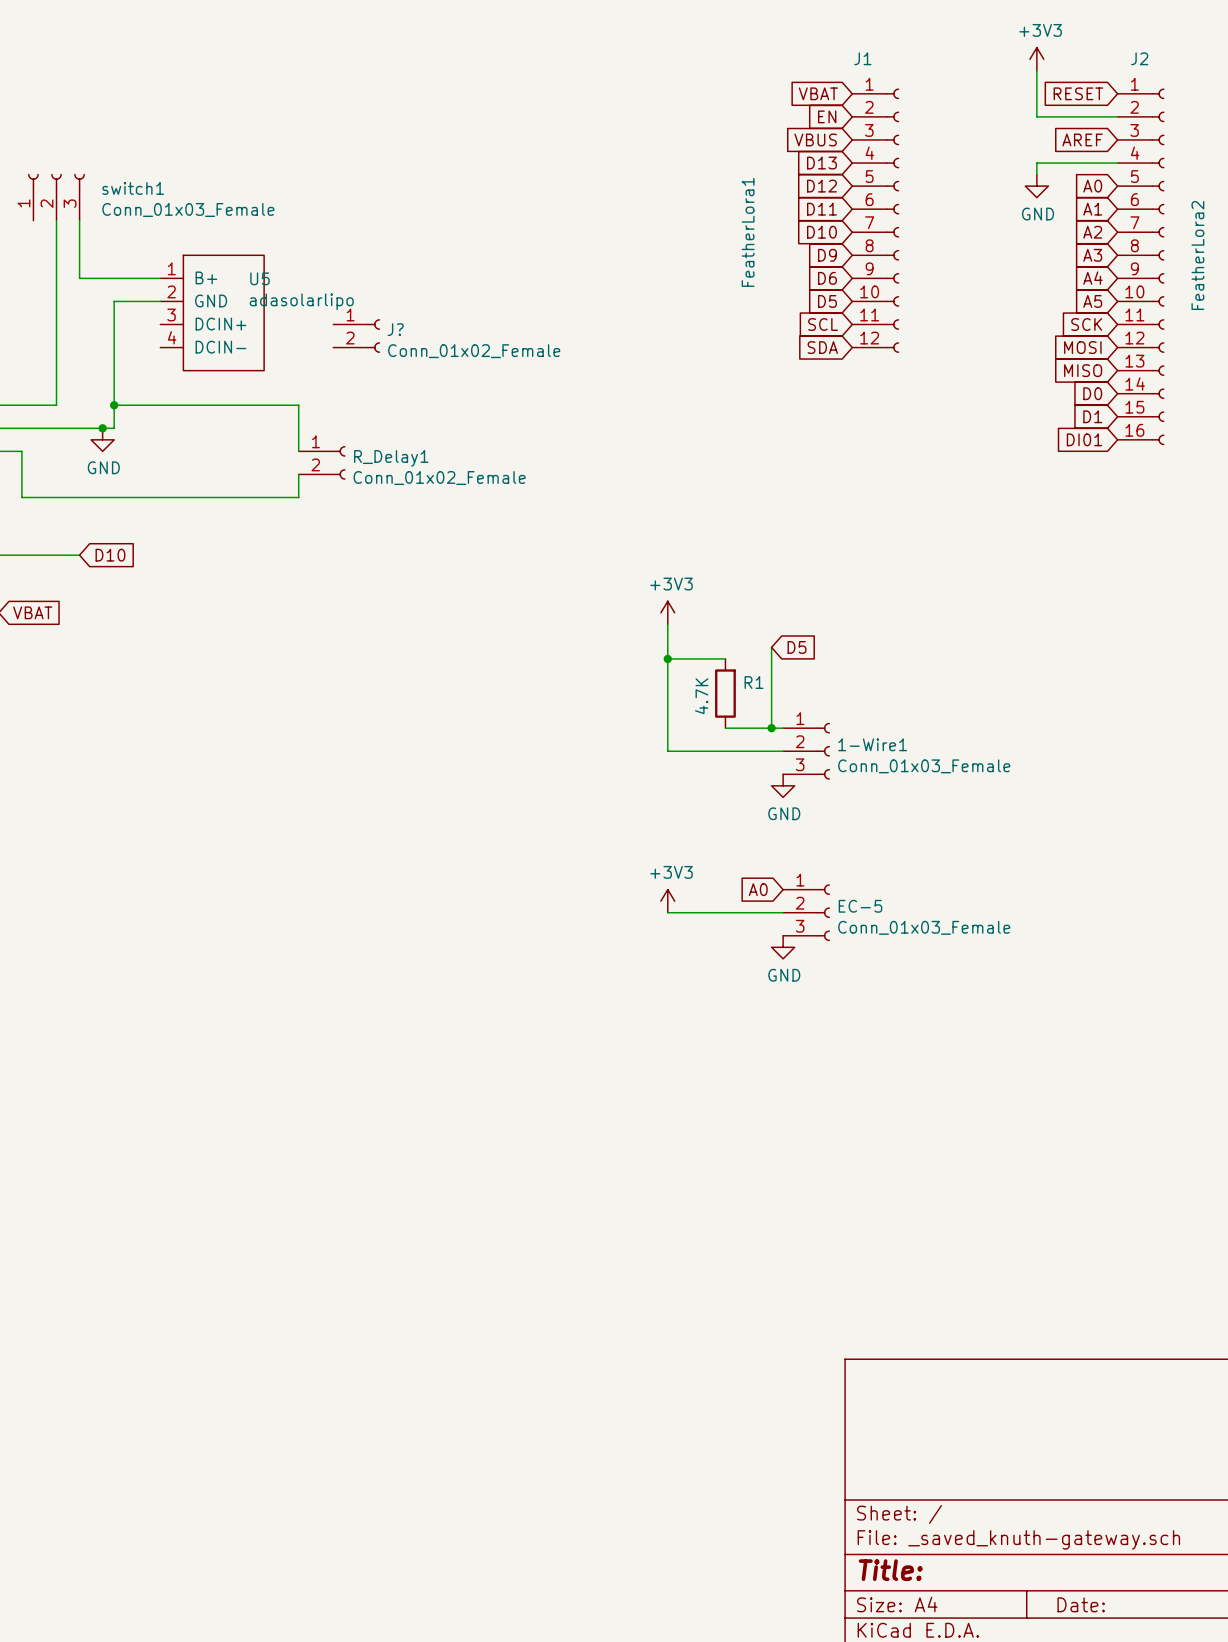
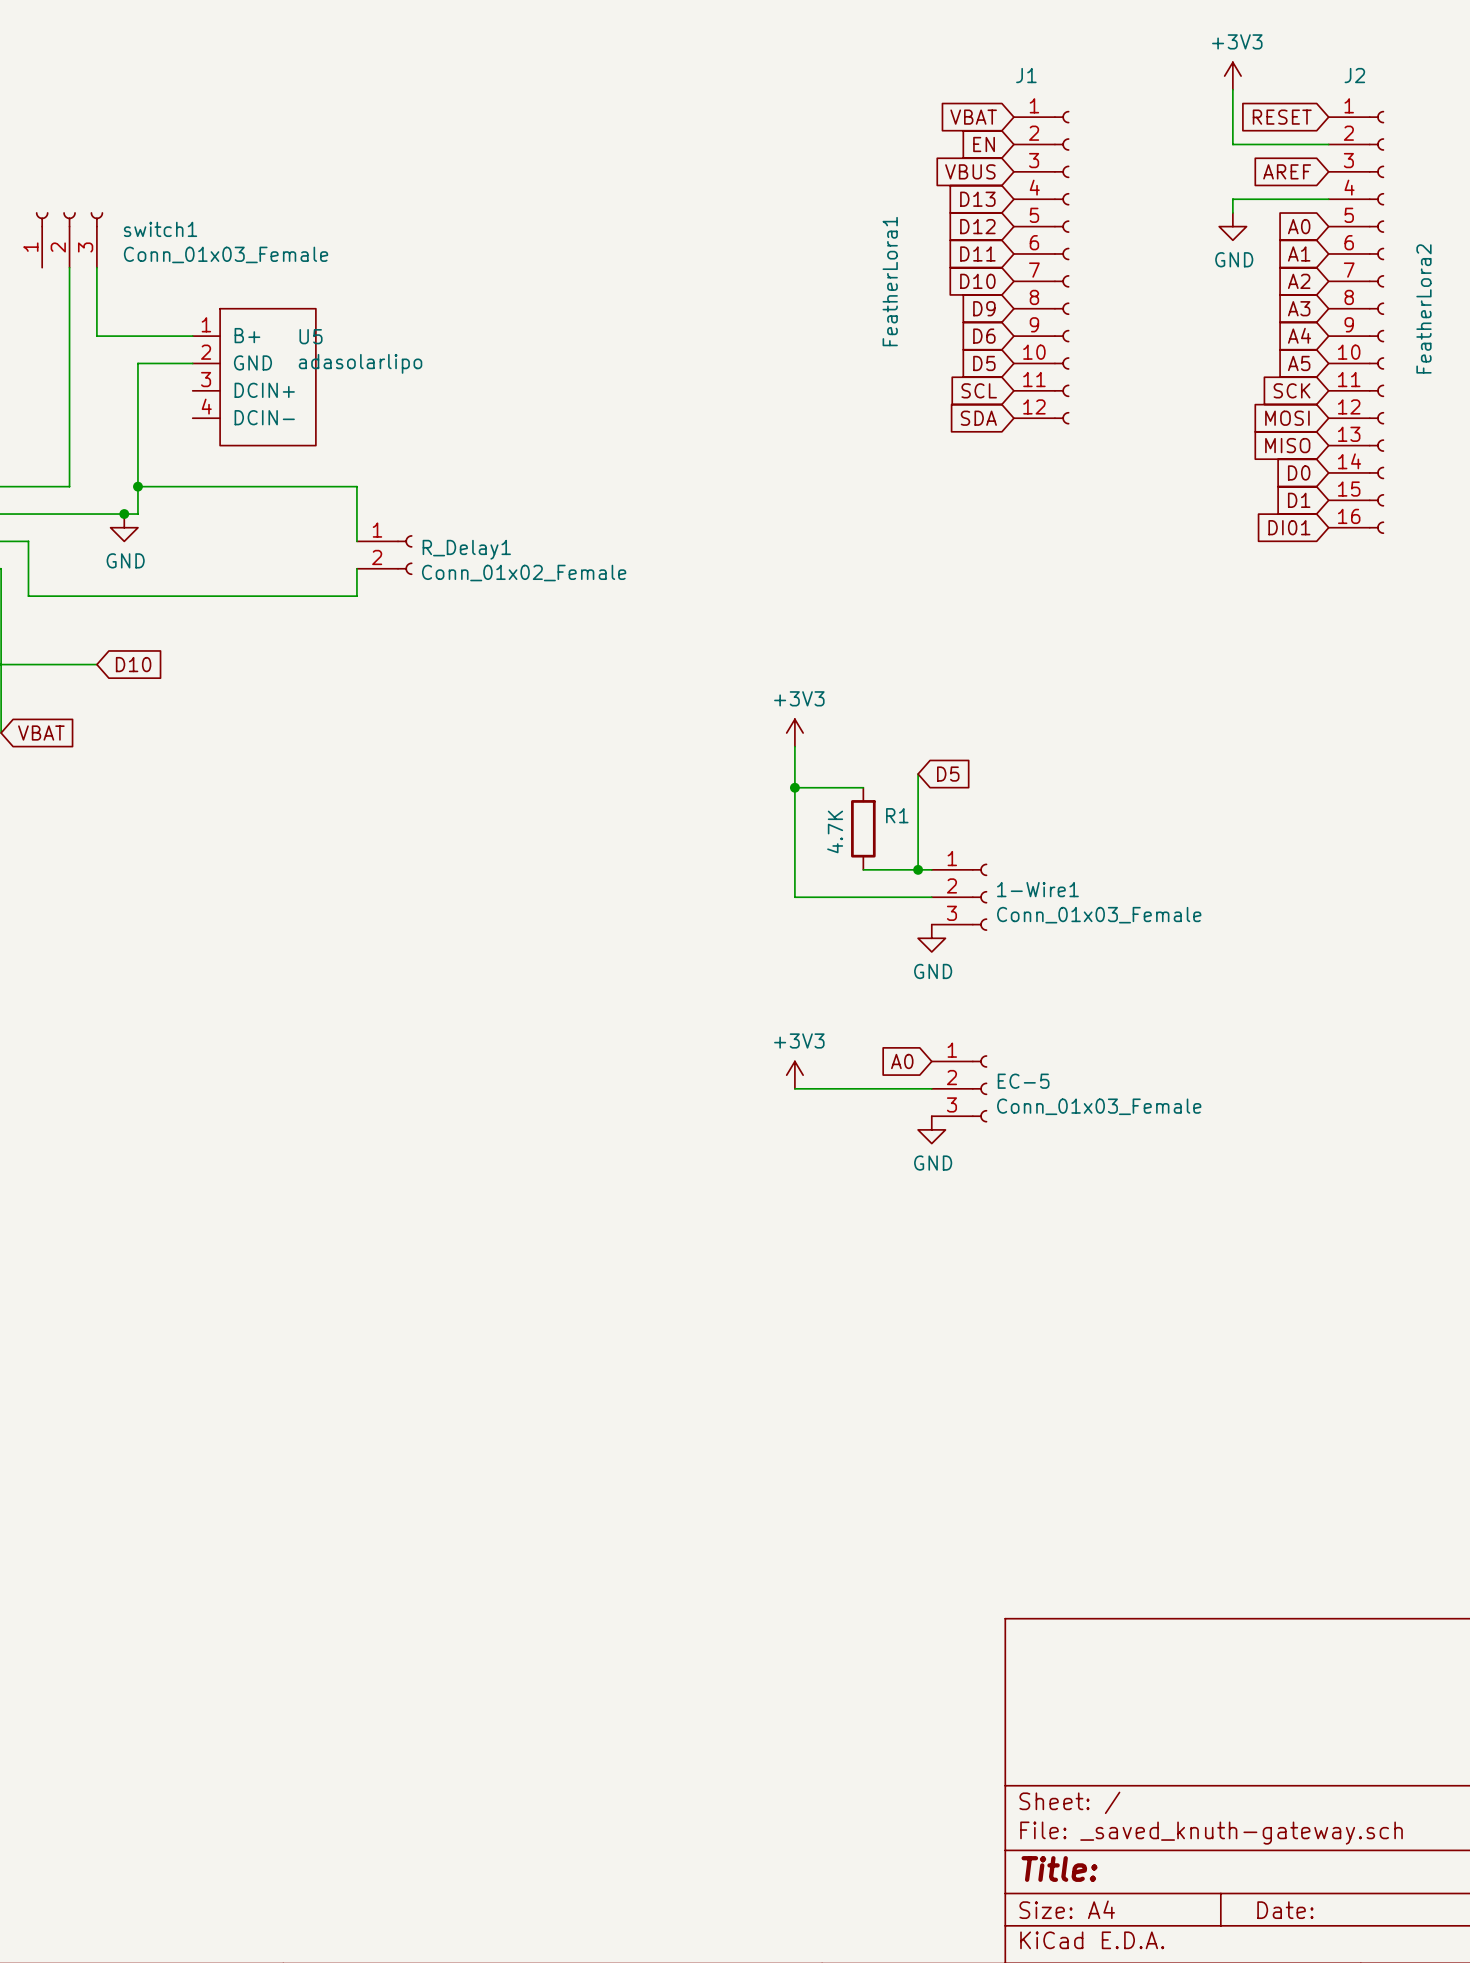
J?: Conn_01x02_Female (356, 336) -> none

